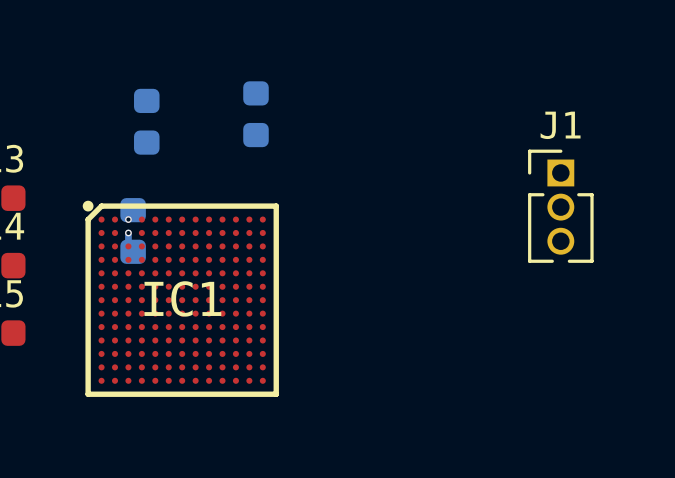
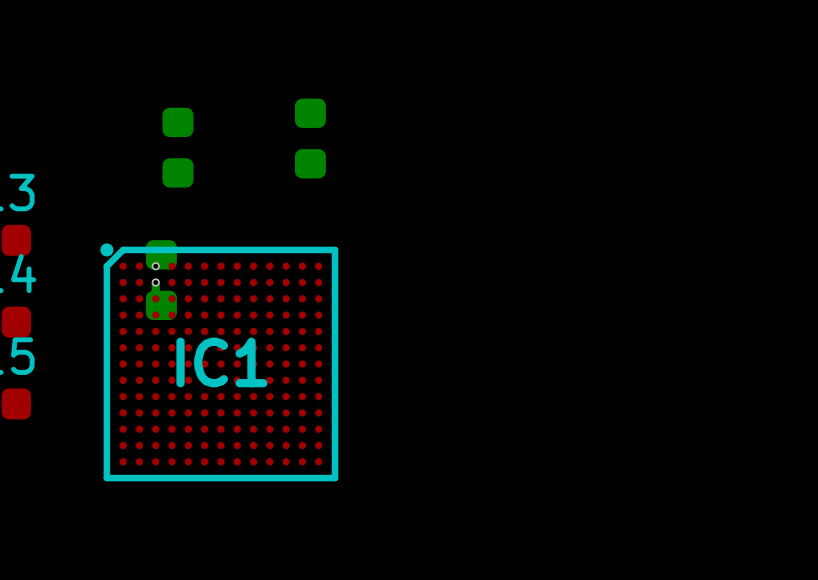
J1: (560, 206) -> none

